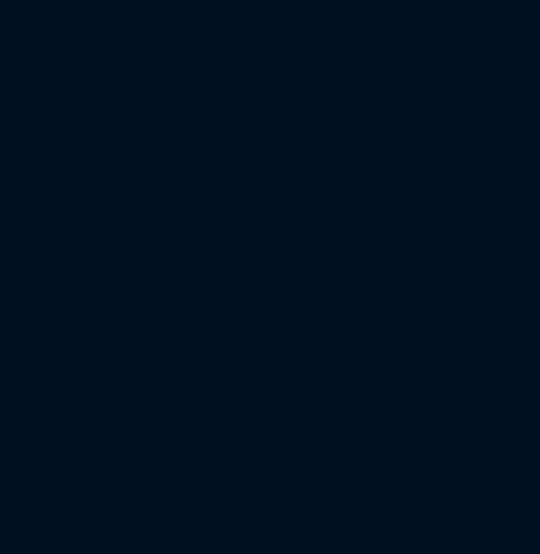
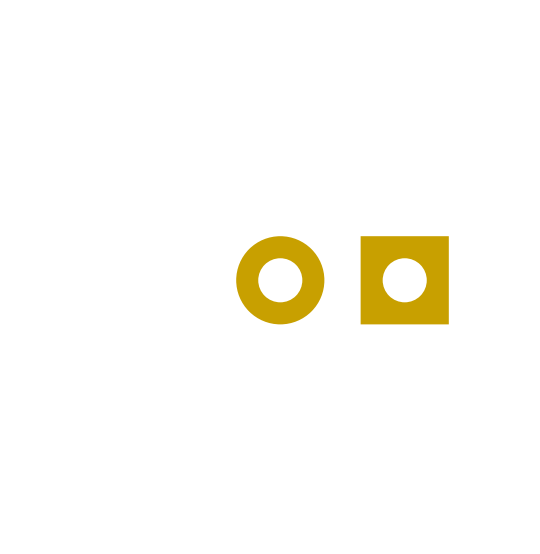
part: none -> (342, 280)

